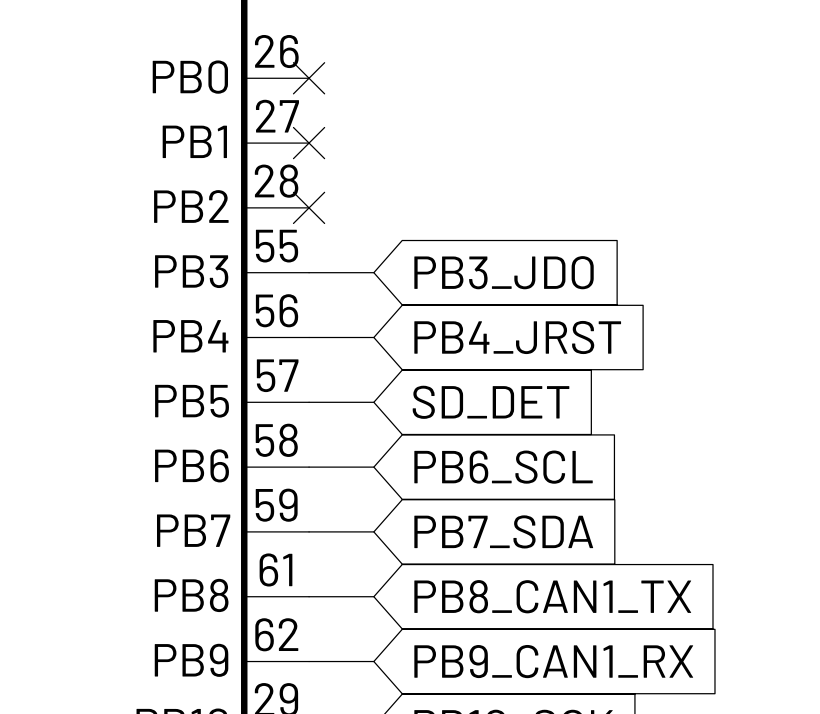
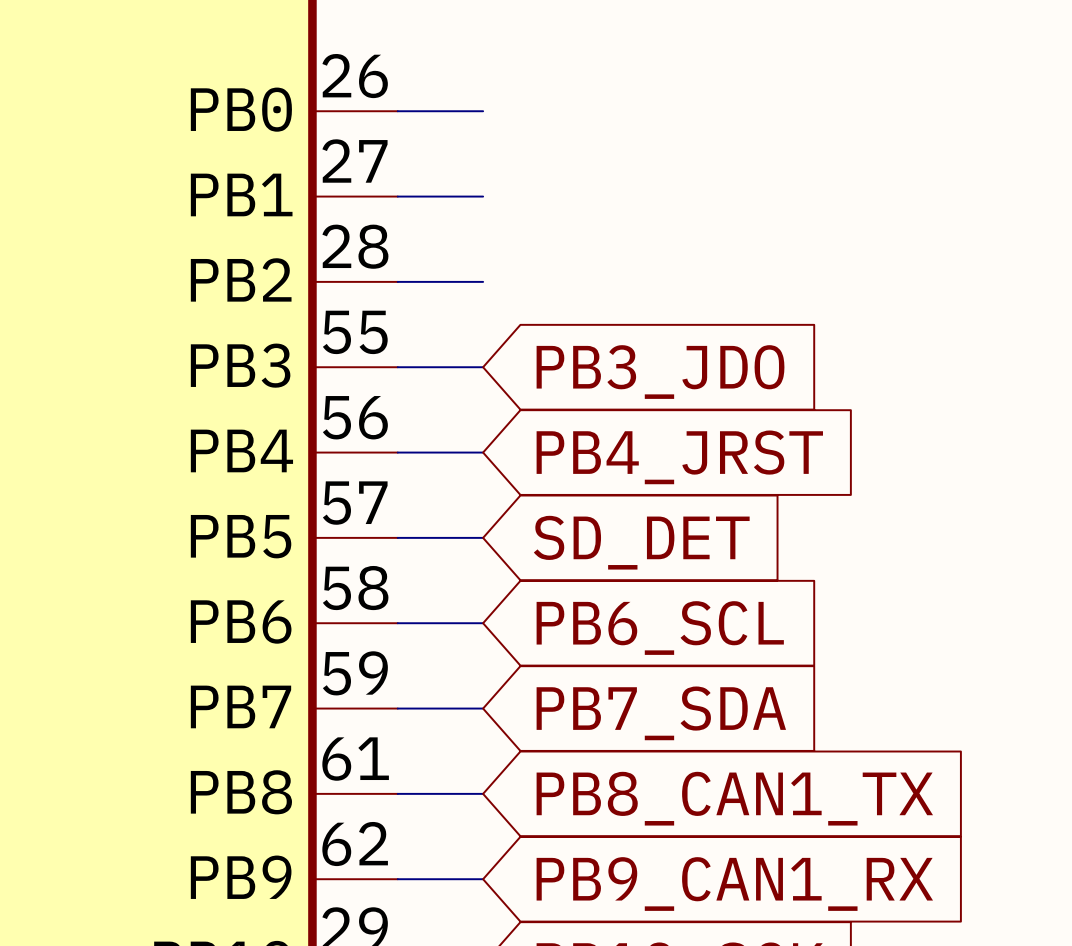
wire: none -> (397, 111) (483, 111)
no-connect mark: (309, 78) -> none
wire: none -> (397, 196) (483, 196)
no-connect mark: (309, 143) -> none
wire: none -> (397, 281) (483, 281)
no-connect mark: (309, 207) -> none

